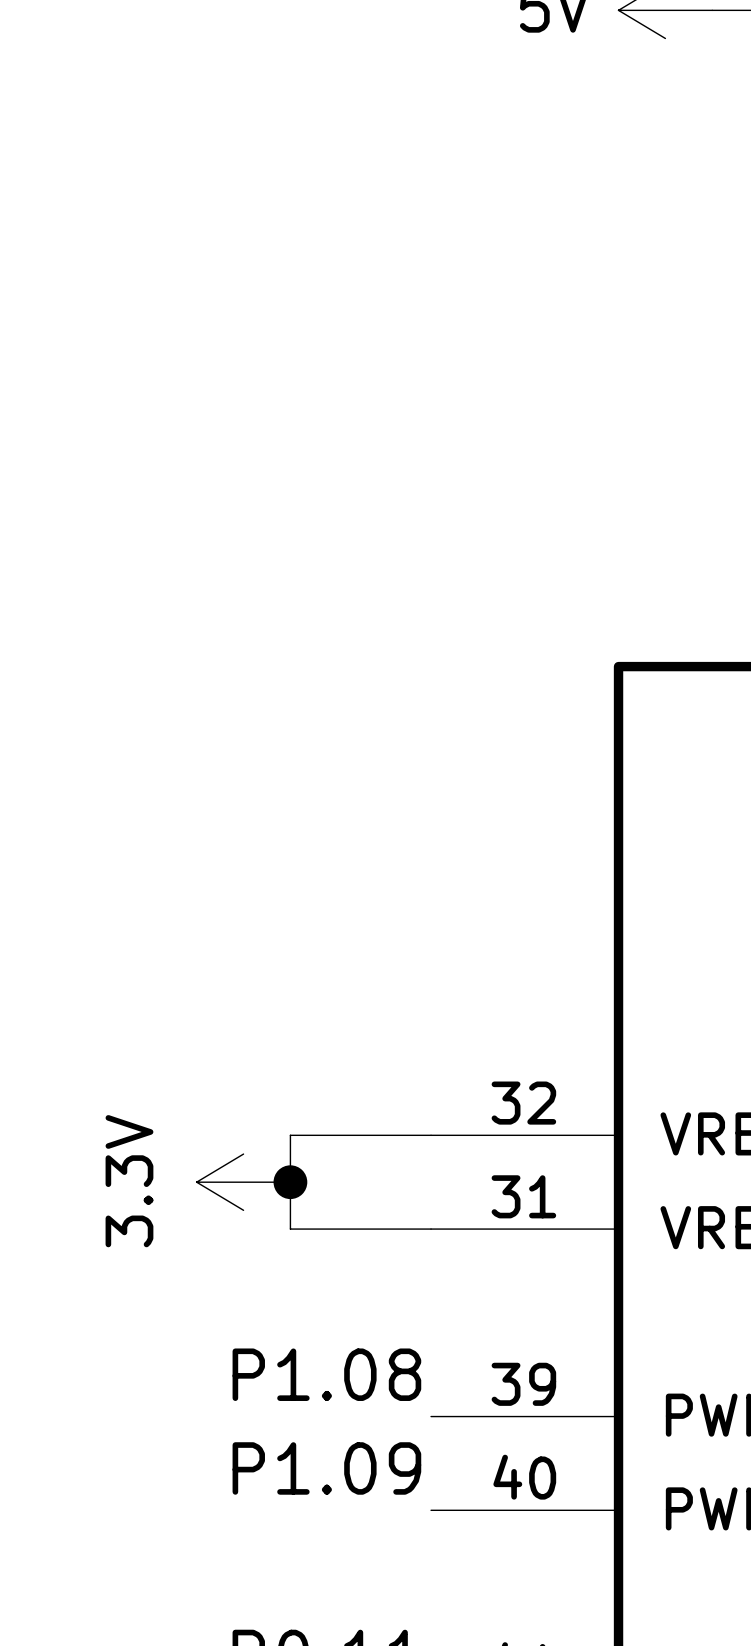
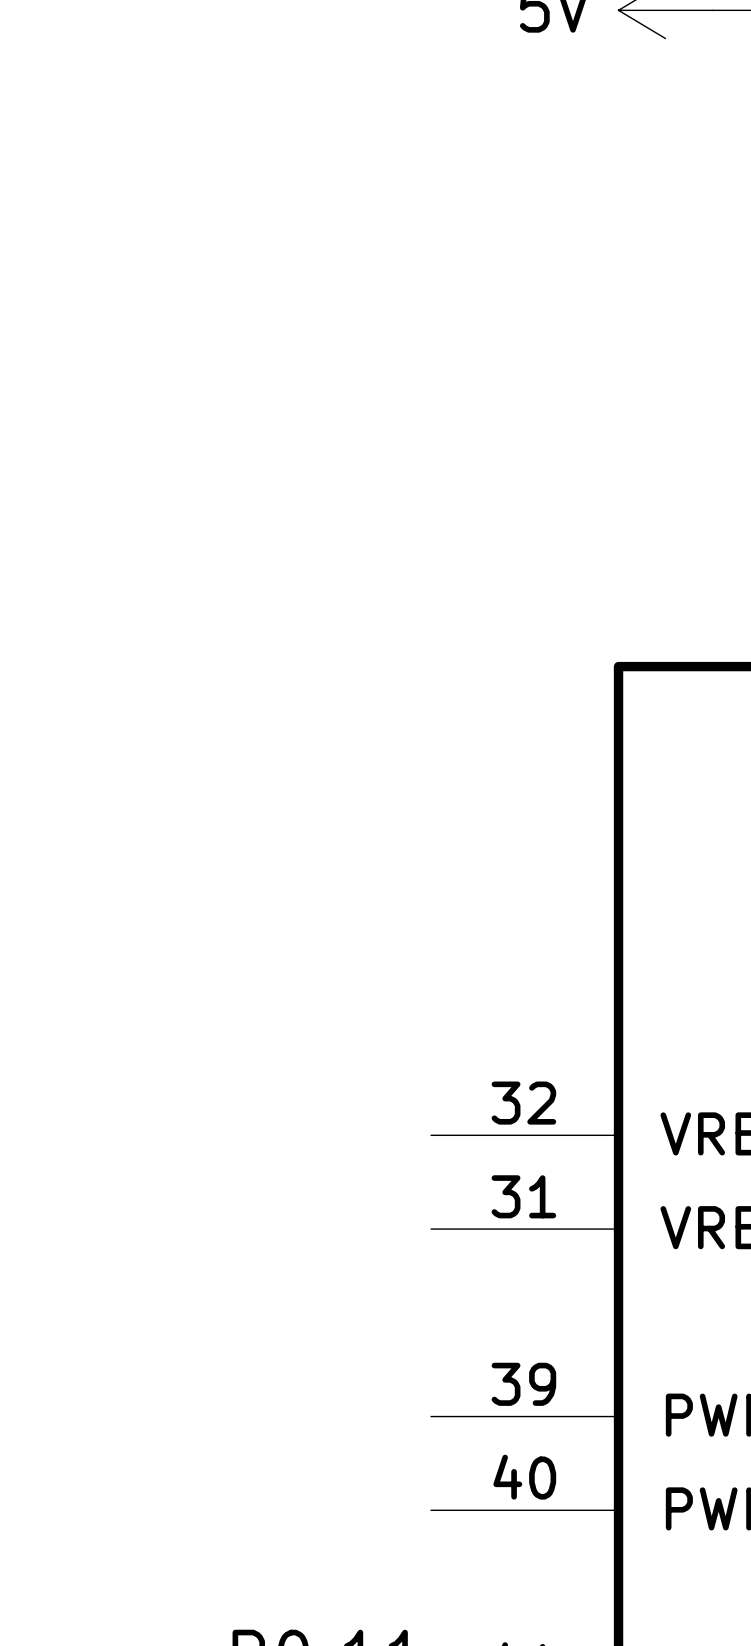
wire: (431, 1135) (290, 1135) (290, 1229) (431, 1229) -> none
power symbol: 3.3V (243, 1182) -> none
junction: (290, 1182) -> none
label: P1.08 (326, 1374) -> none
label: P1.09 (326, 1468) -> none

